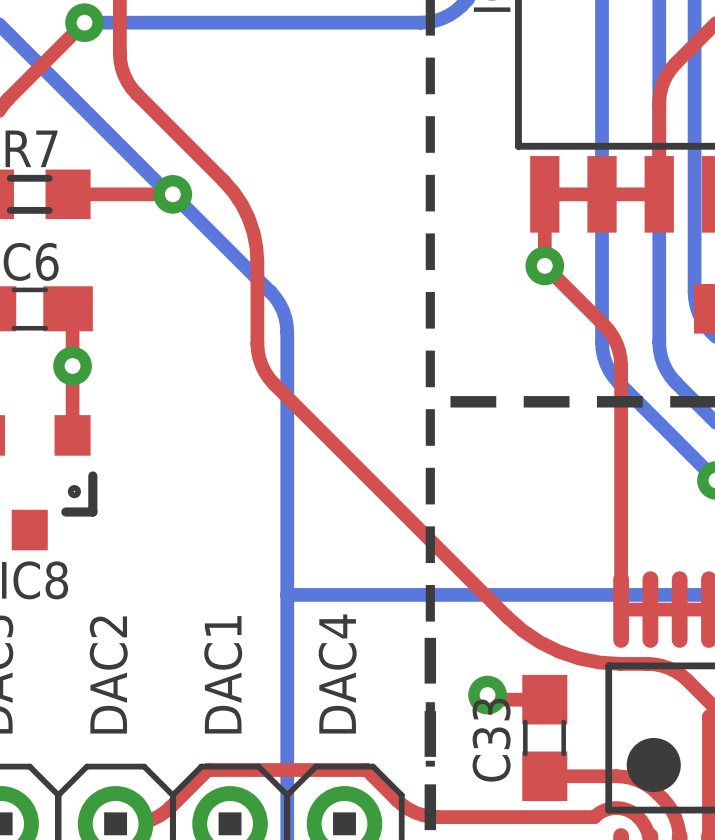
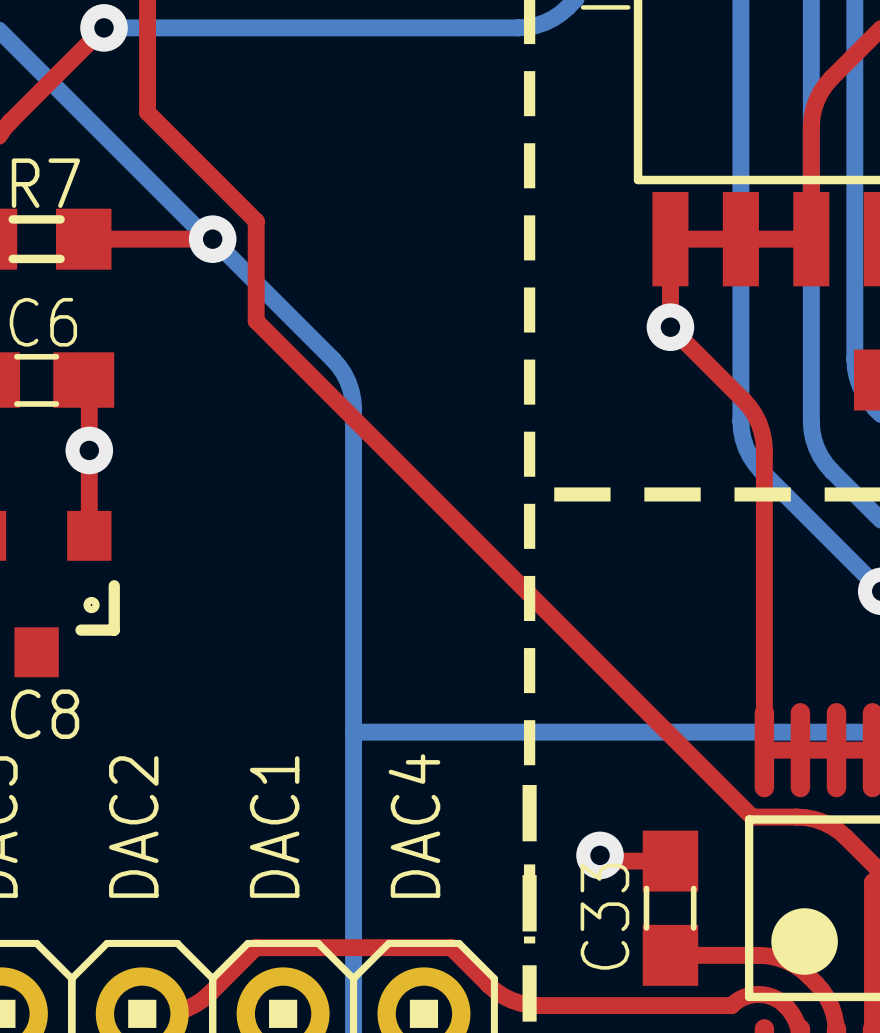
top track: (119, 53) (121, 68) (131, 88) (223, 181) (233, 192) (248, 218) (256, 247) (257, 351) (261, 365) (269, 378) (522, 630) (559, 651) (599, 662) (620, 663) -> (147, 65) (147, 112) (256, 221) (256, 321) (752, 817) (763, 817)

